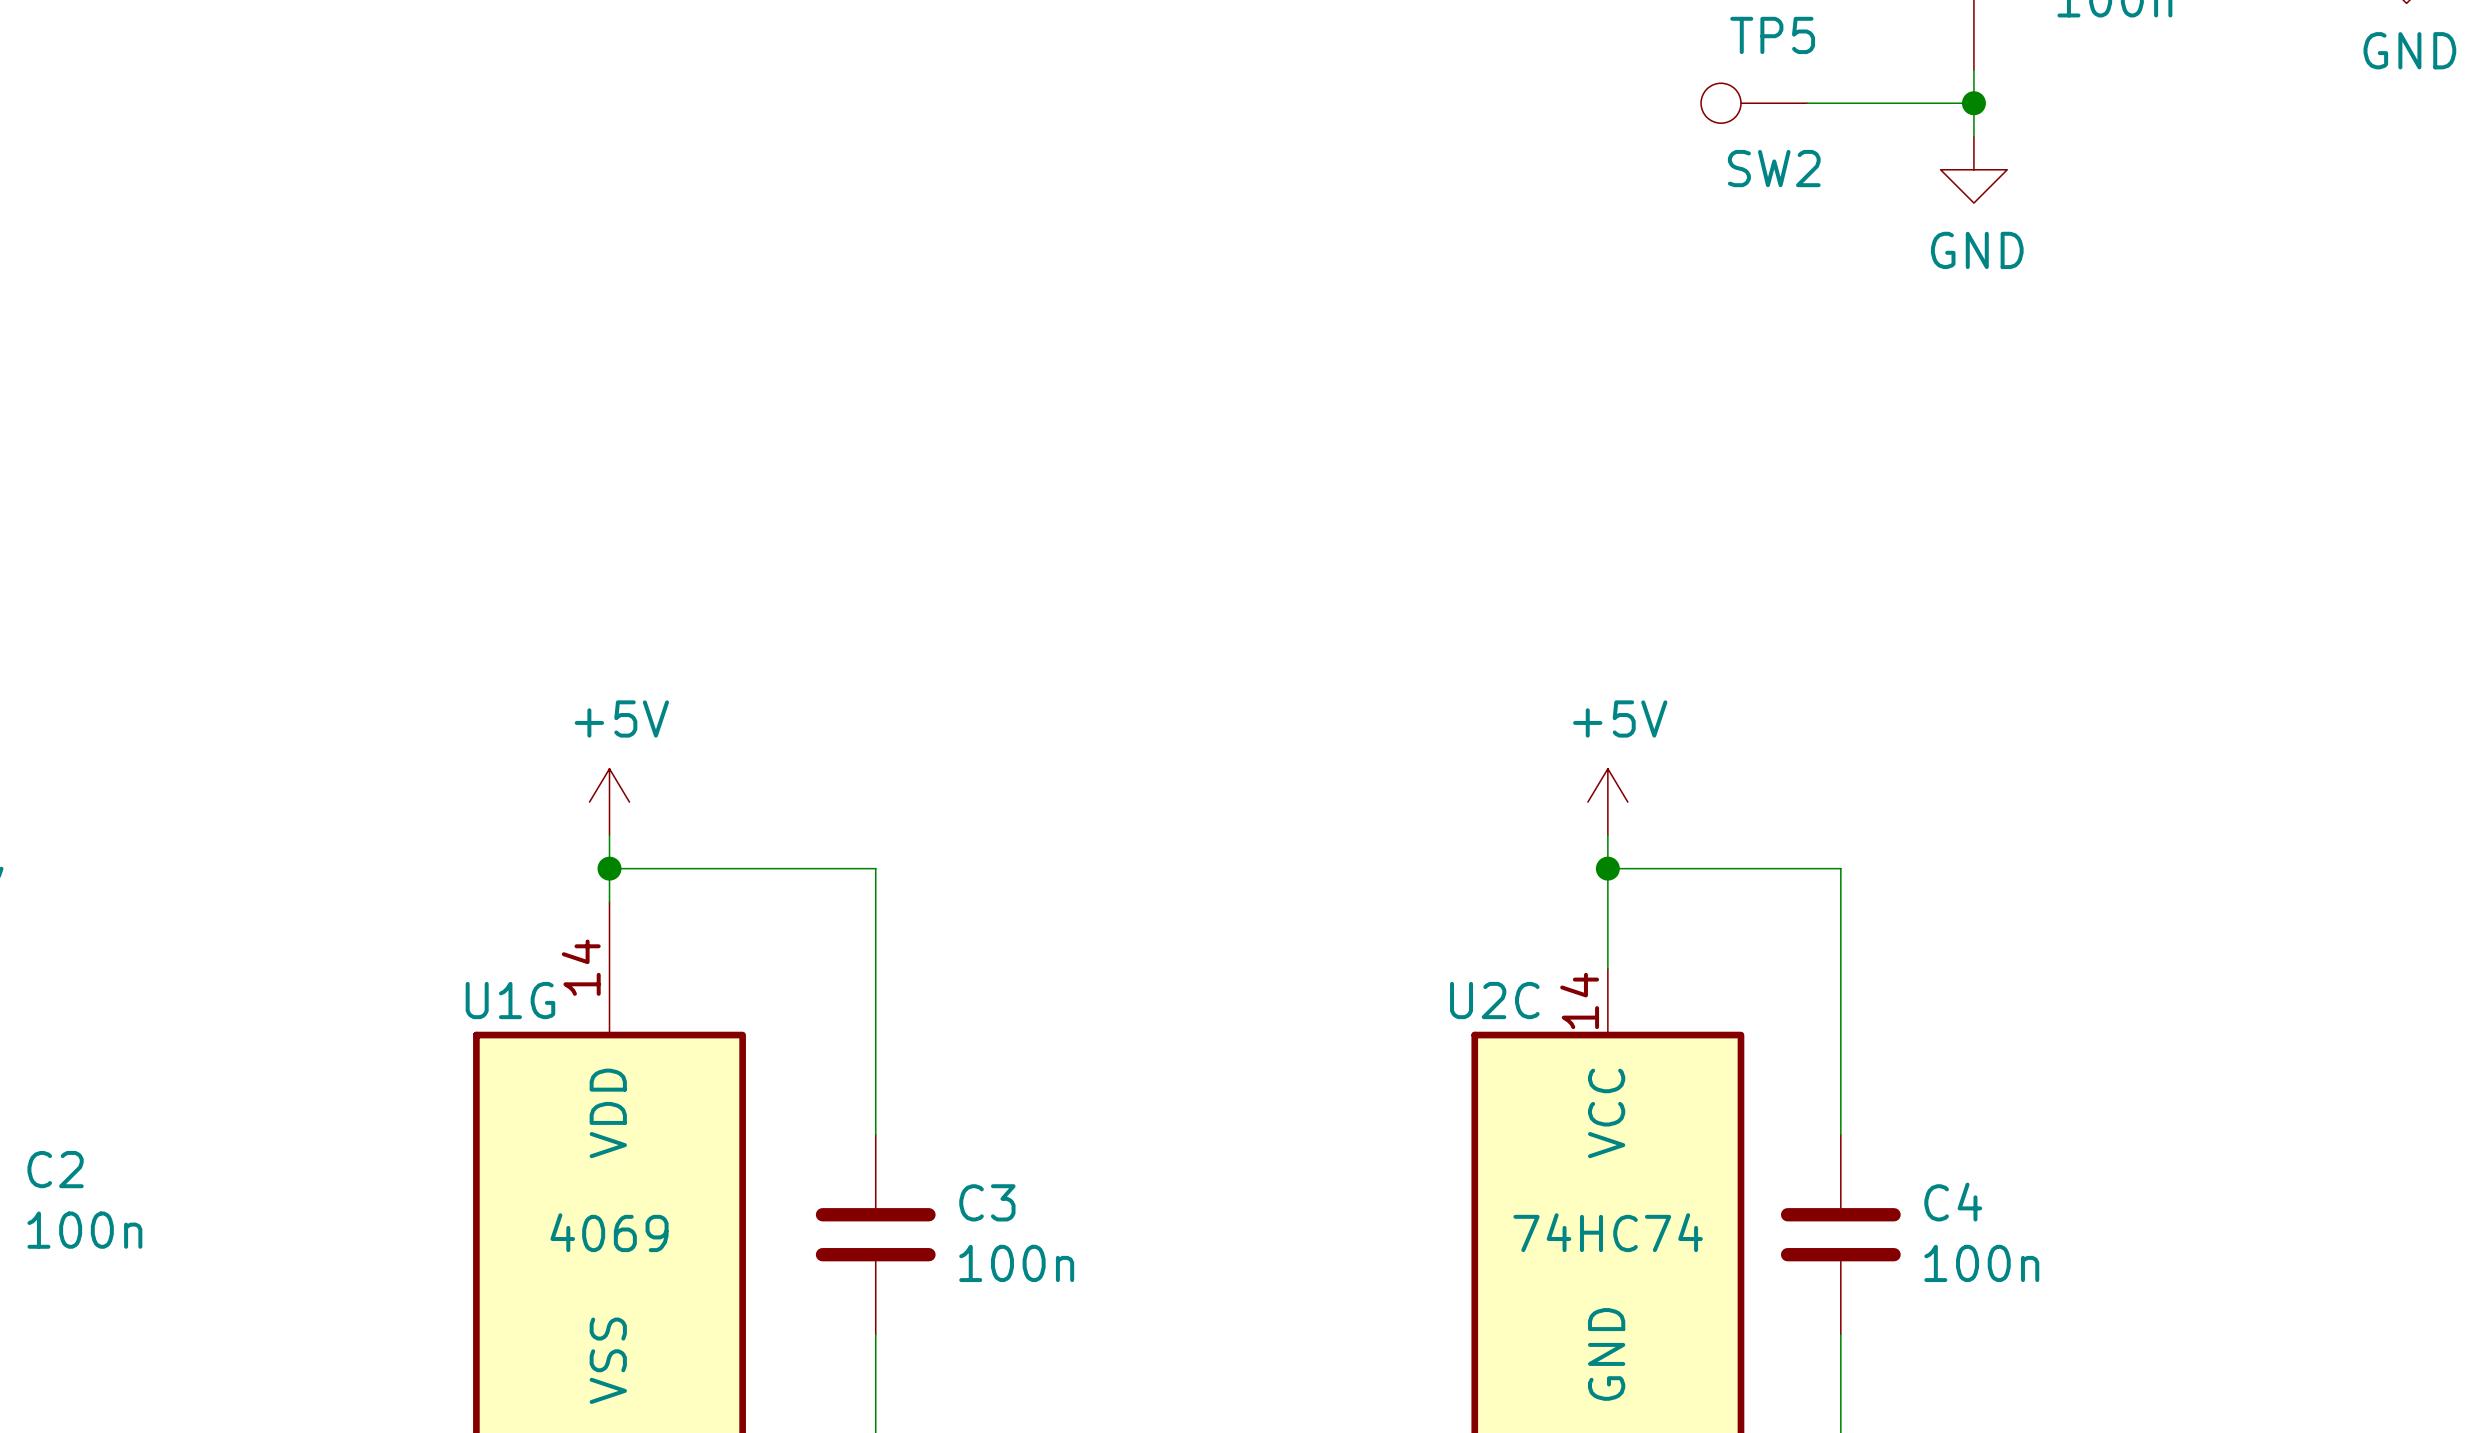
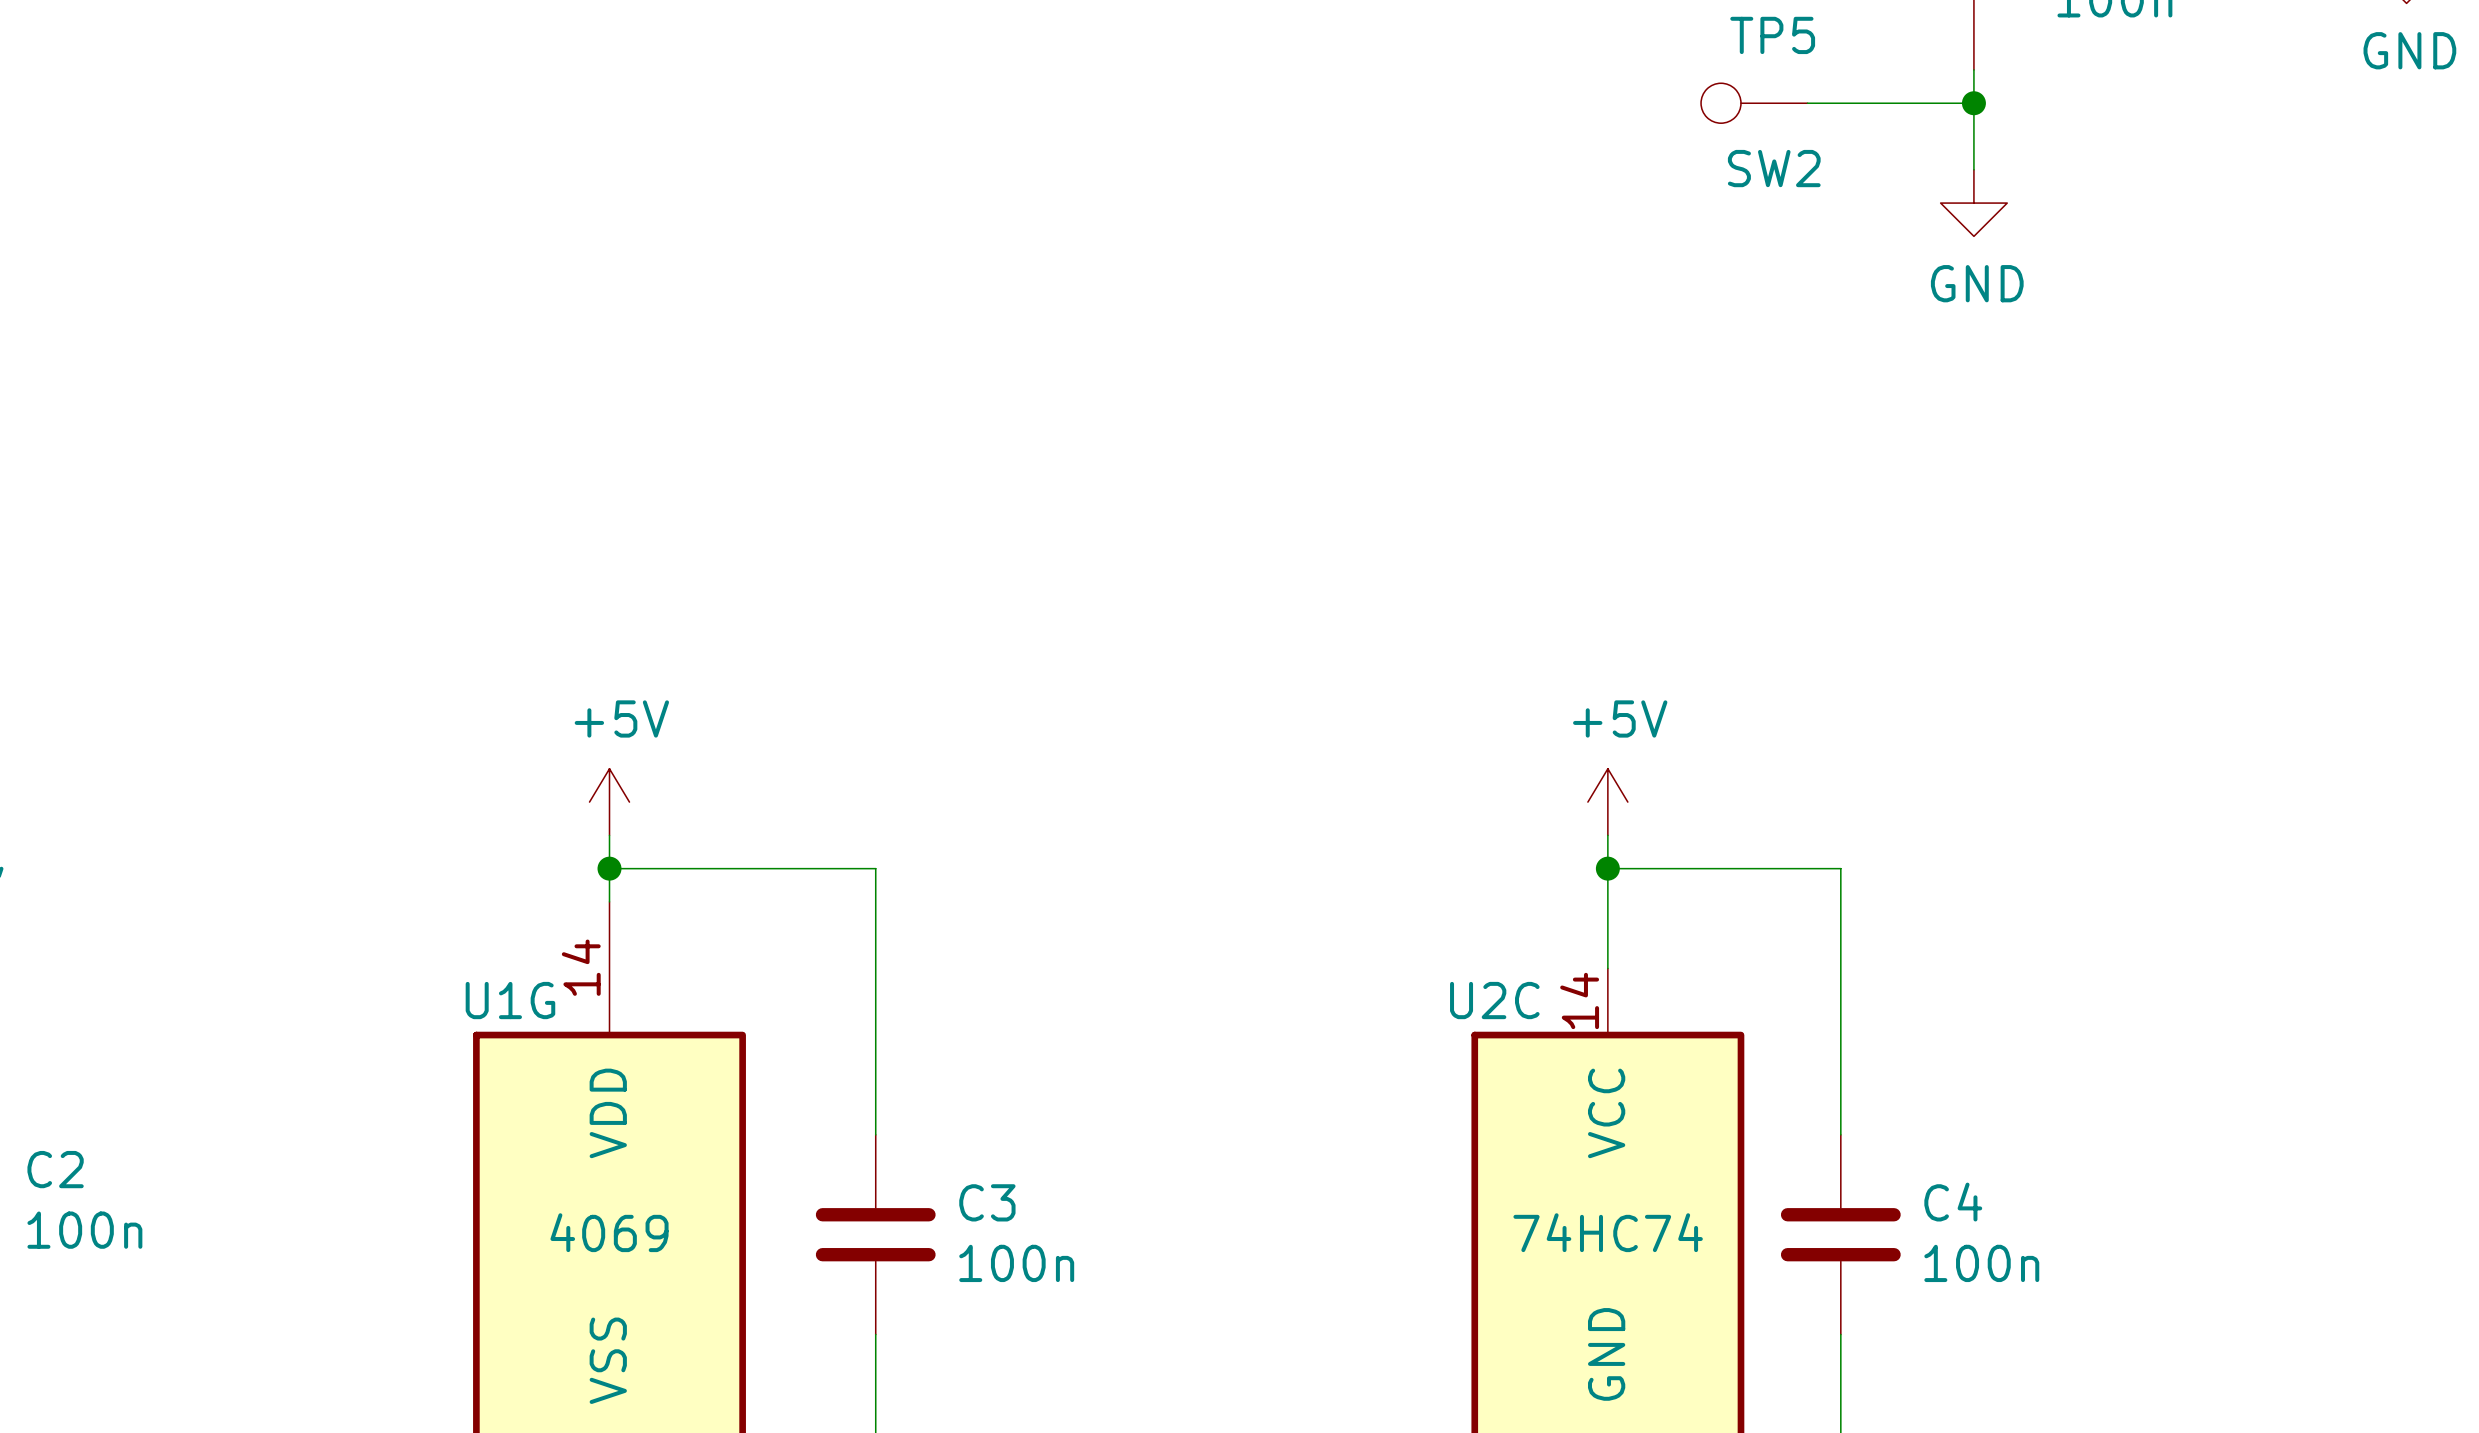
power symbol position: GND (1973, 169) -> GND (1973, 203)

